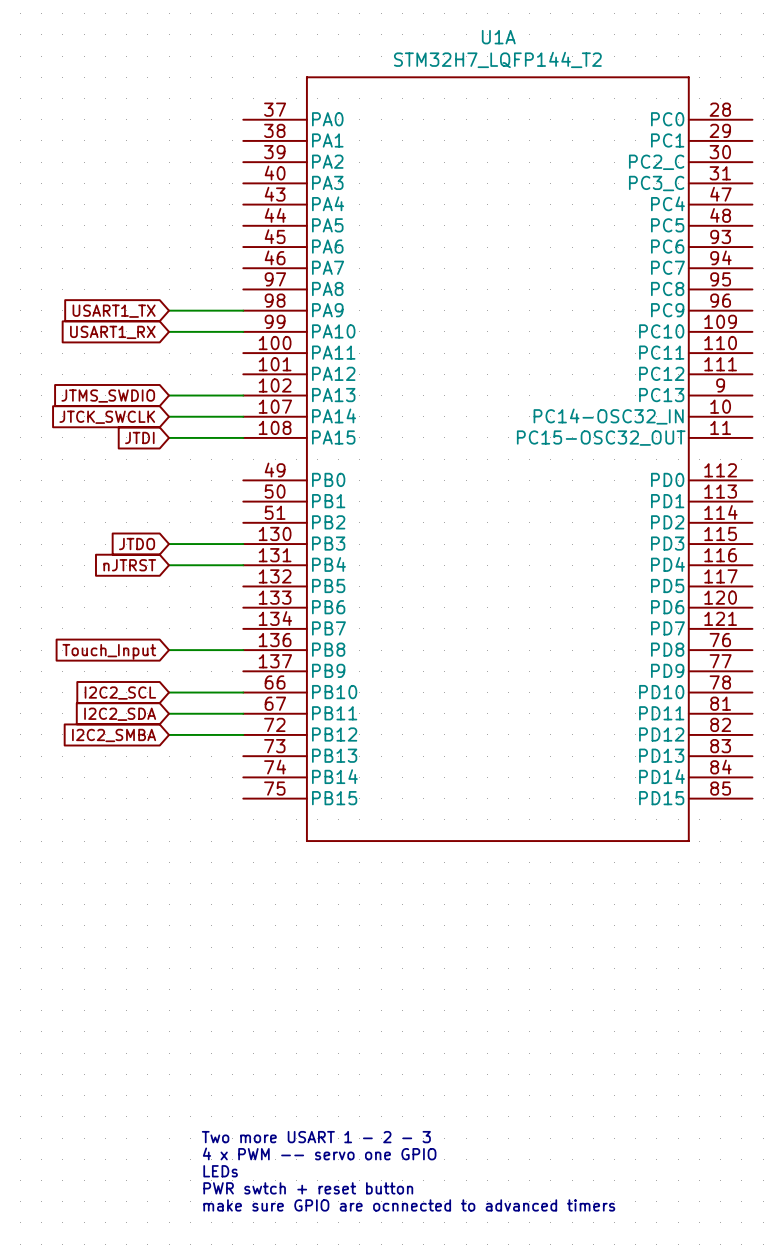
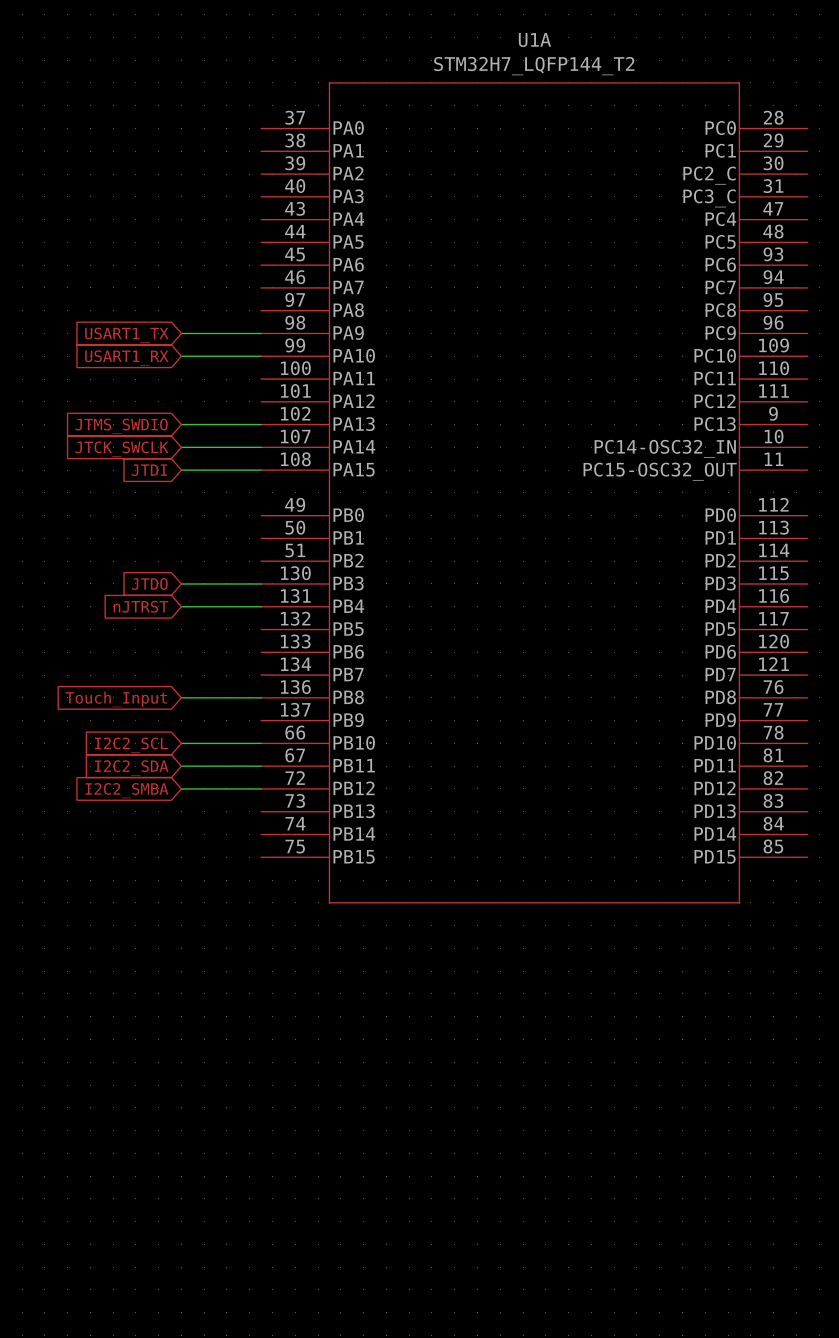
text: Two more USART 1 - 2 - 3 (316, 1137) -> none
text: 4 x PWM -- servo one GPIO (319, 1153) -> none
text: LEDs (220, 1171) -> none
text: PWR swtch + reset button (308, 1188) -> none
text: make sure GPIO are ocnnected to advanced timers (409, 1205) -> none

